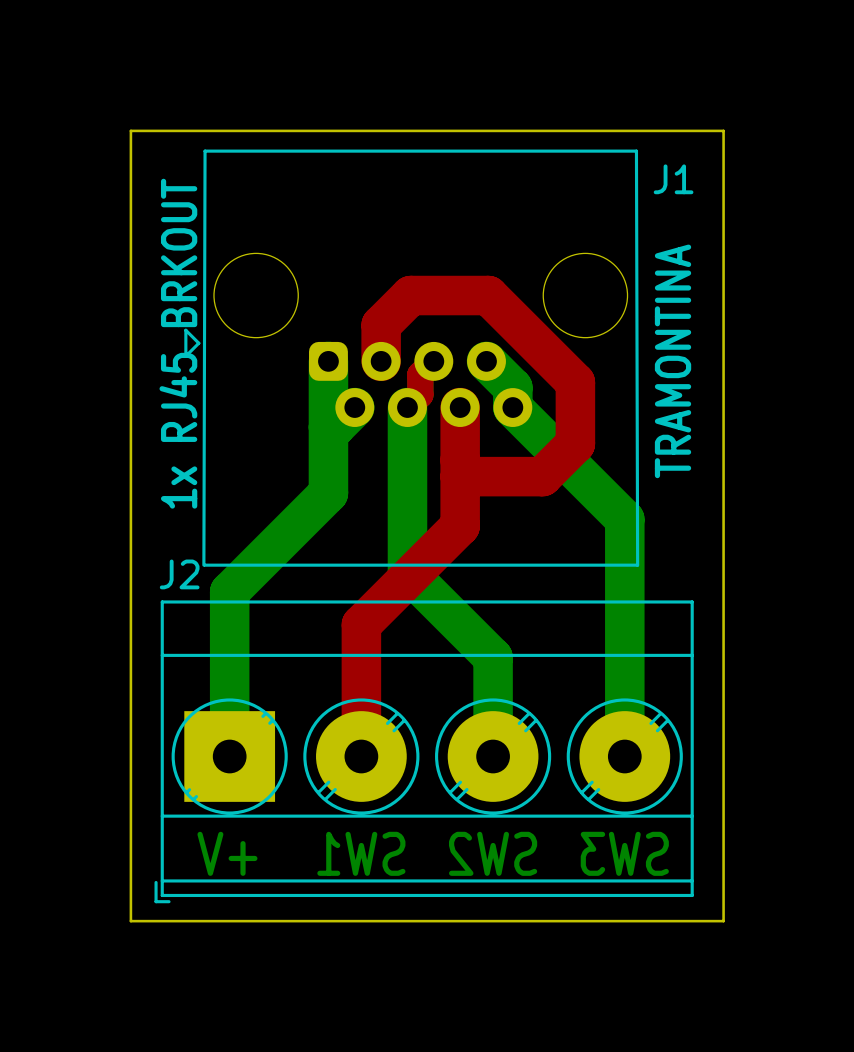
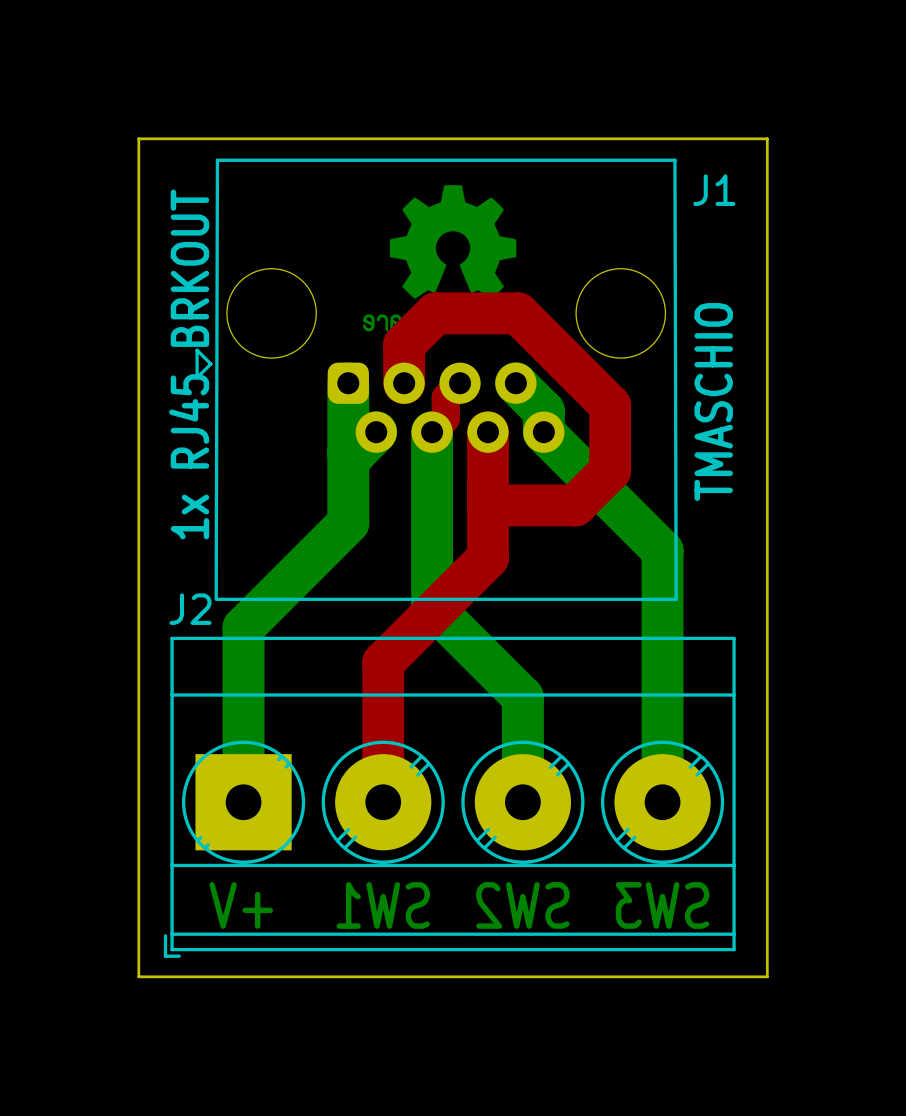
drawing: none -> [363, 185, 543, 338]
text: TRAMONTINA (673, 361) -> TMASCHIO (713, 402)

